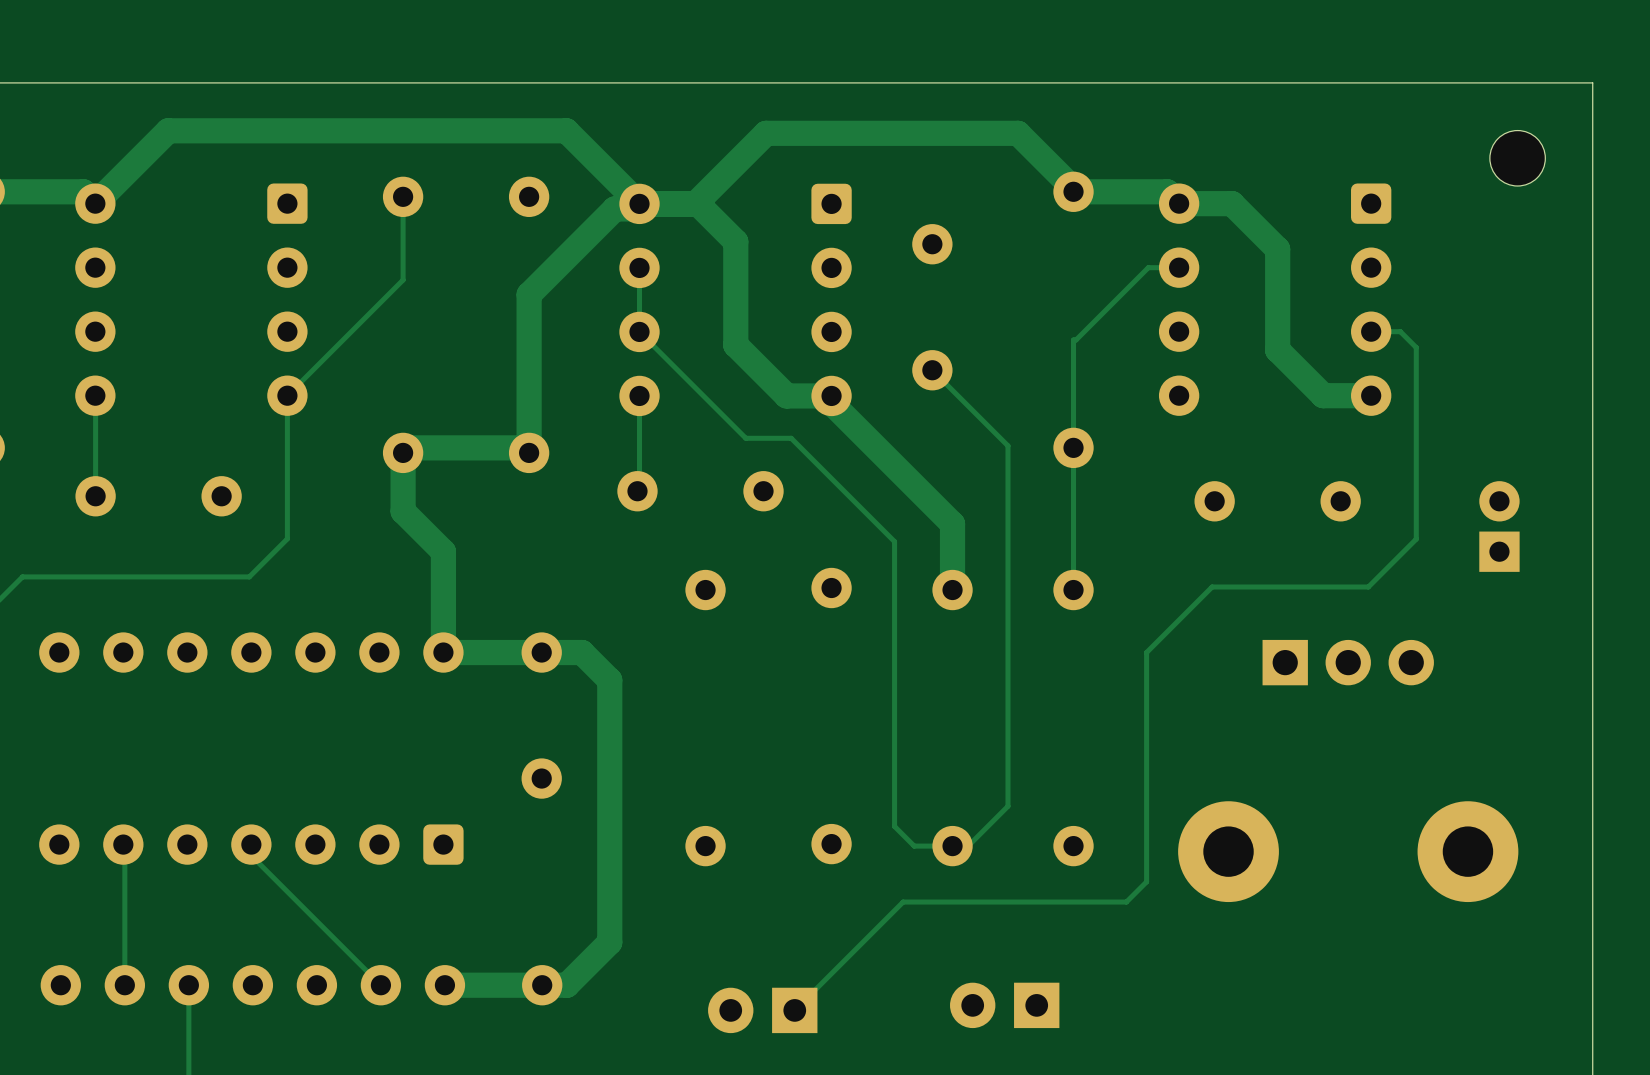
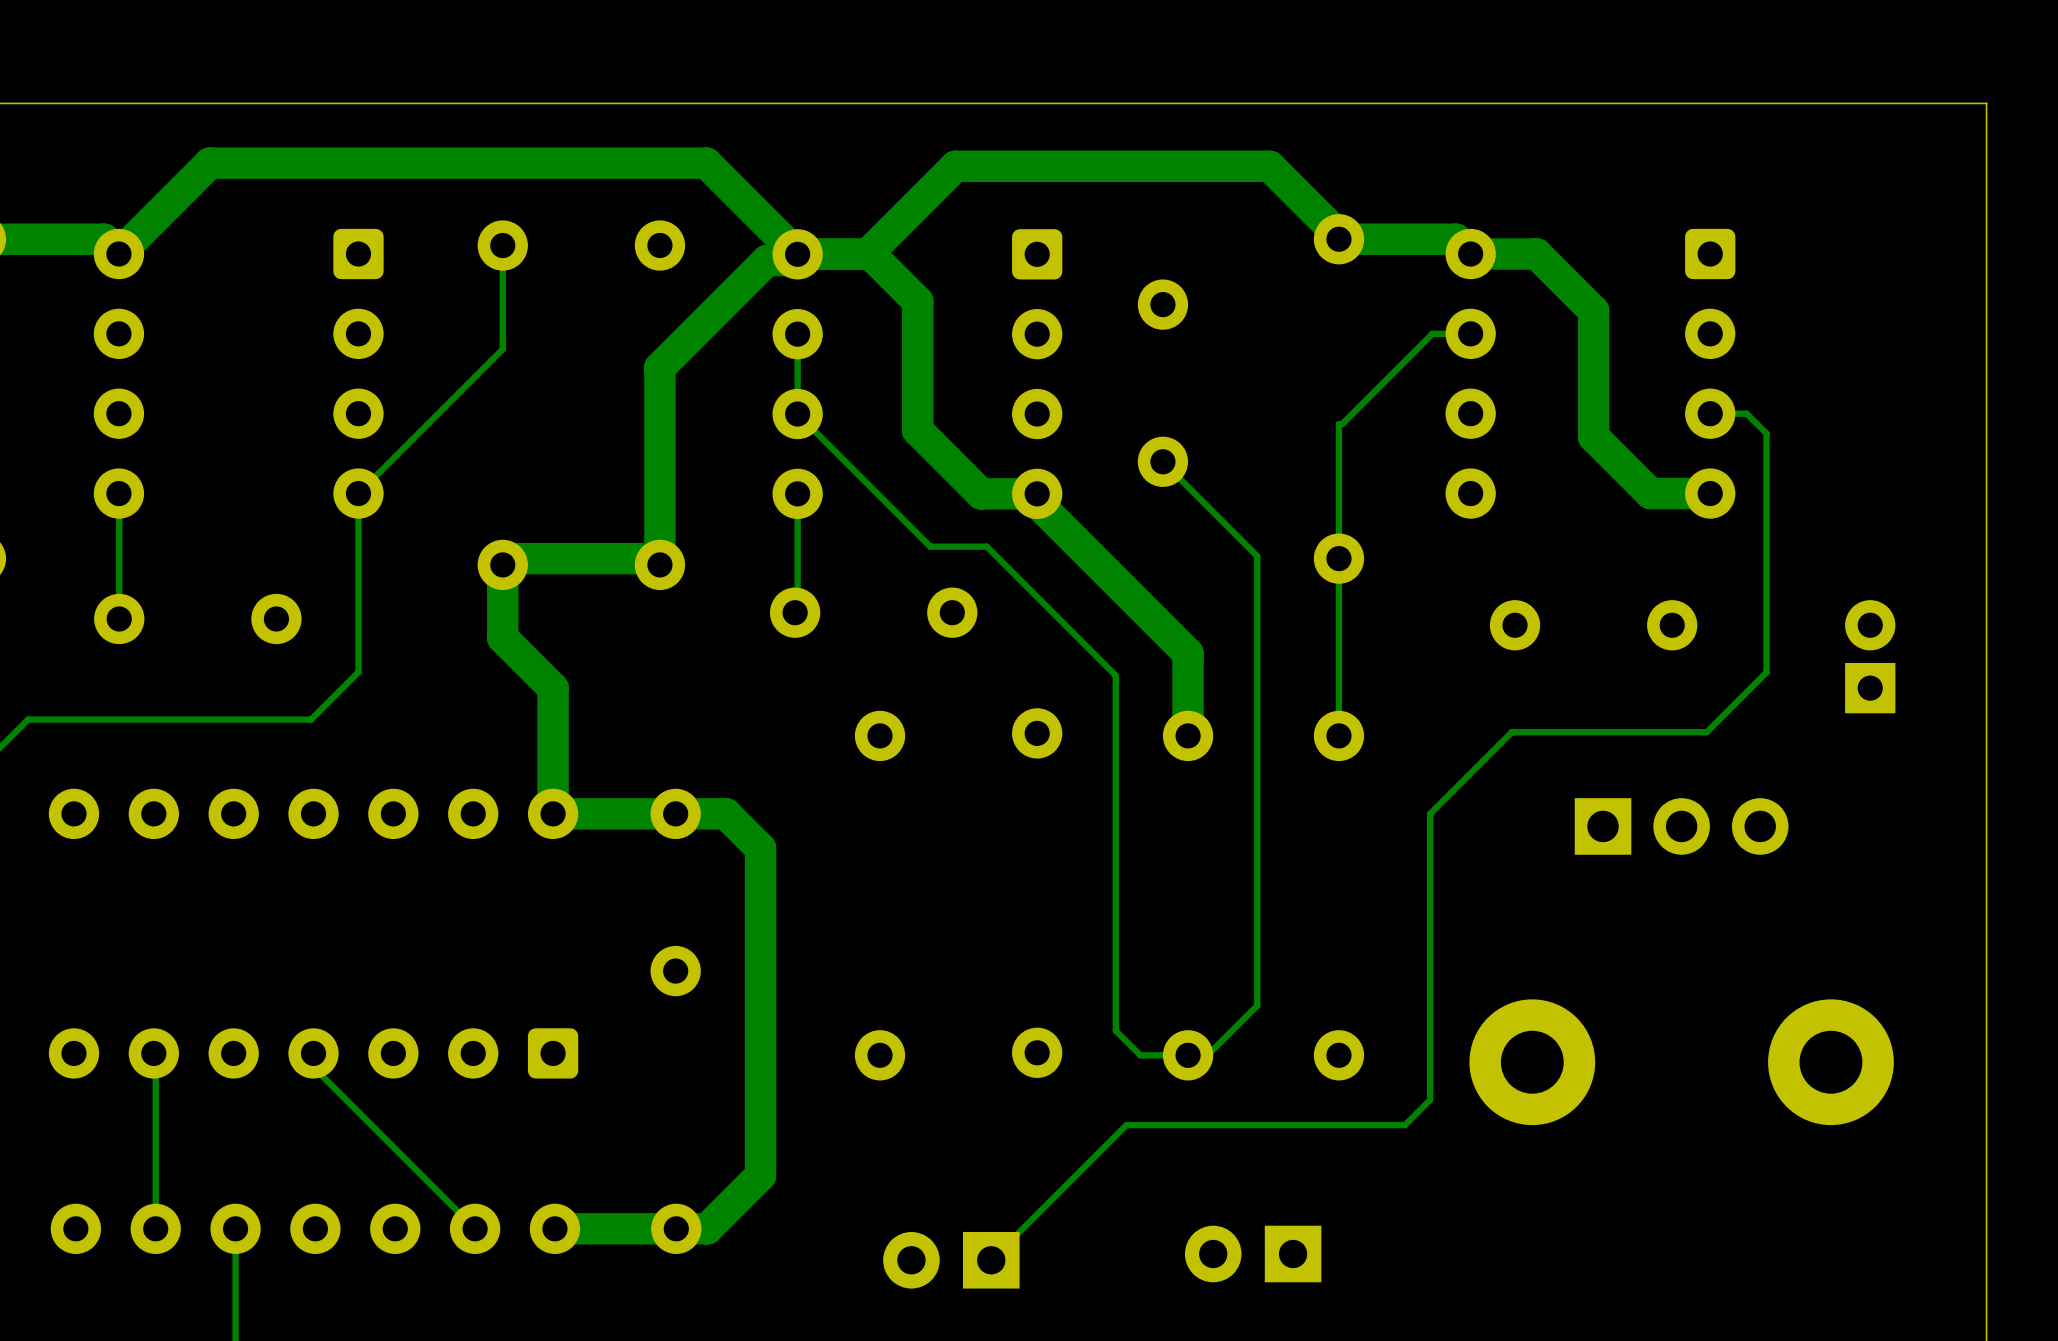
part: (1517, 158) -> none

